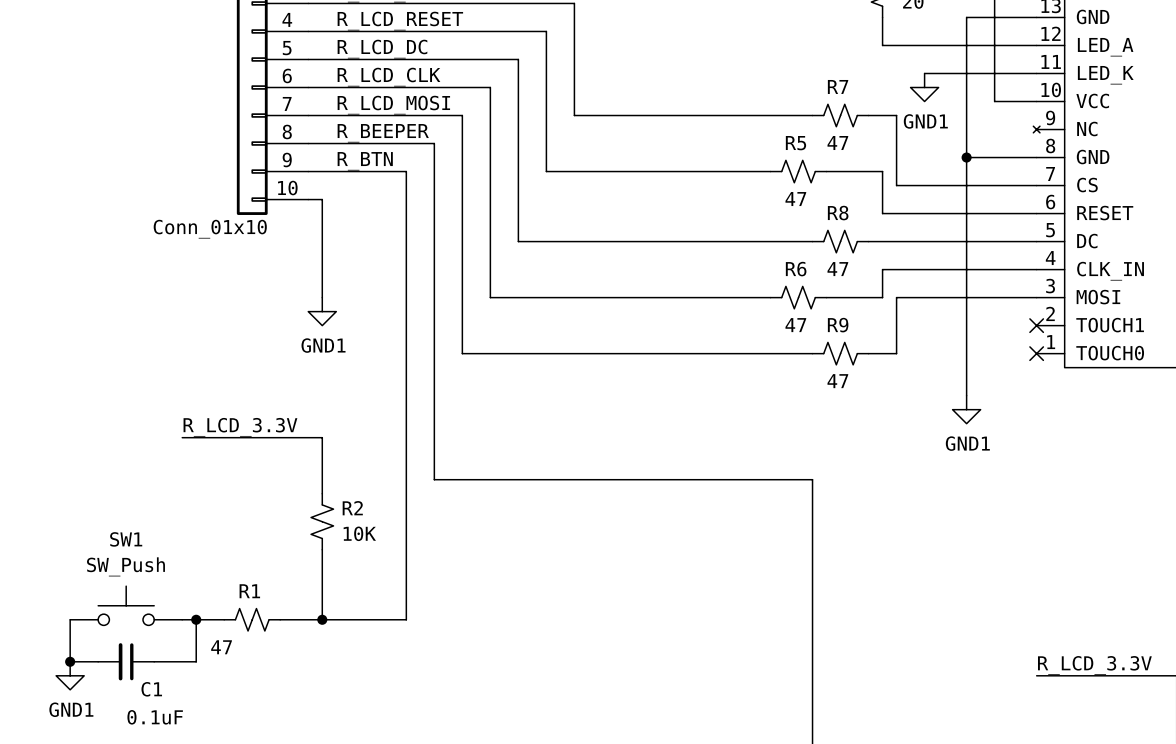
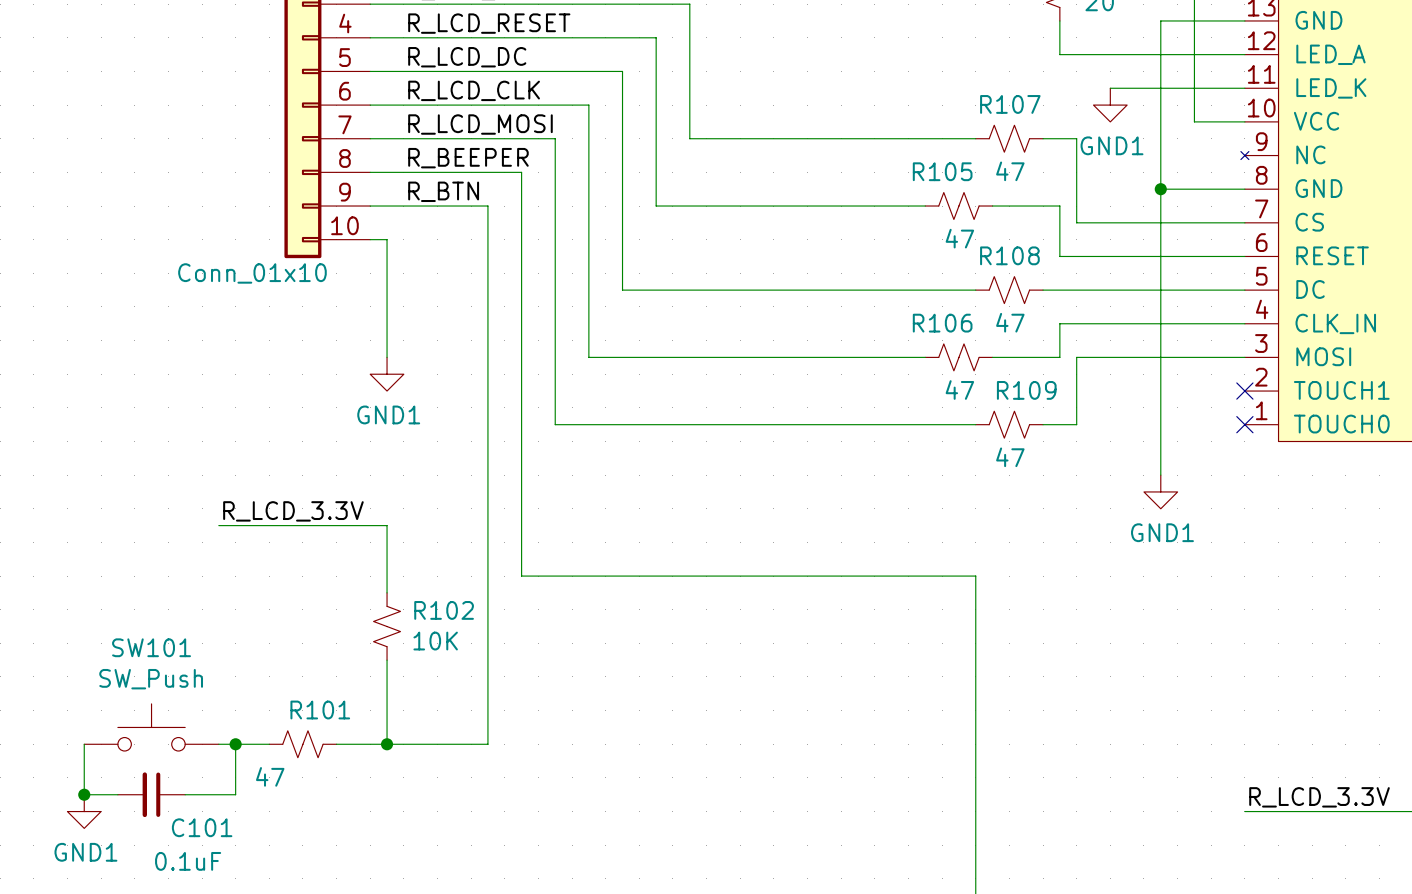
R7 name: R7 (838, 86) -> R107 (1010, 104)
R5 name: R5 (795, 143) -> R105 (942, 171)
R8 name: R8 (838, 213) -> R108 (1009, 255)
R6 name: R6 (796, 269) -> R106 (942, 323)
R9 name: R9 (838, 325) -> R109 (1026, 390)
R2 name: R2 (352, 508) -> R102 (444, 610)
SW1 name: SW1 (126, 539) -> SW101 (151, 647)
R1 name: R1 (249, 591) -> R101 (320, 710)
C1 name: C1 (151, 689) -> C101 (202, 827)

